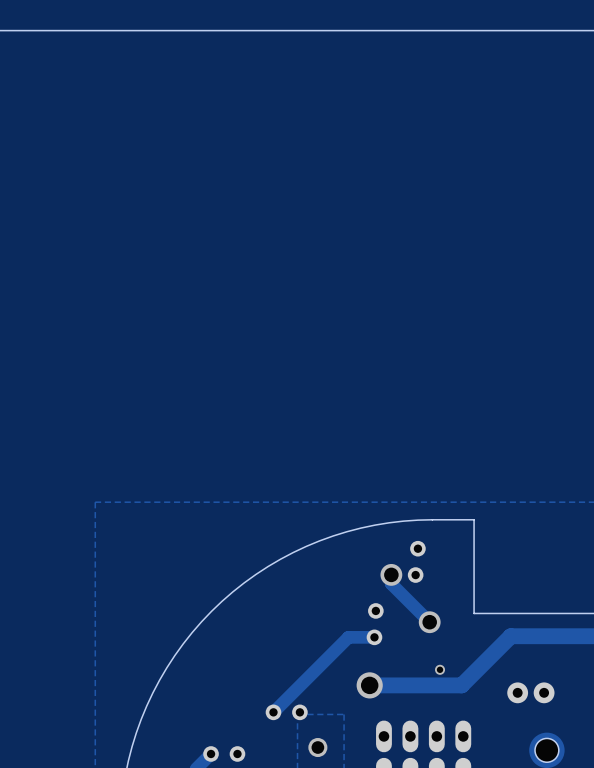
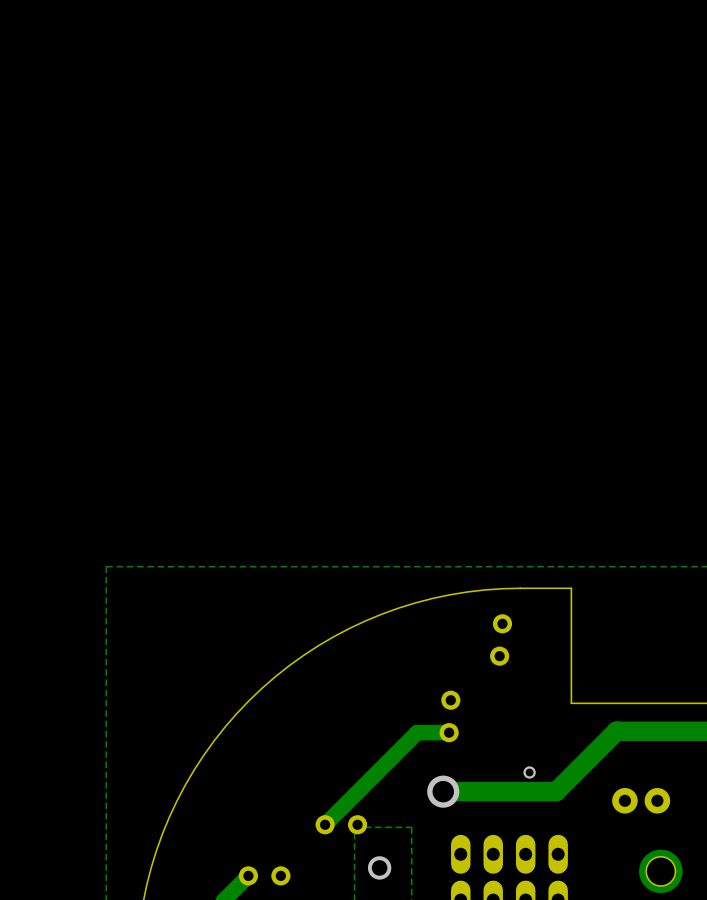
track: (391, 574) (391, 583) (429, 622) -> none
via: (391, 574) -> none
via: (429, 622) -> none

